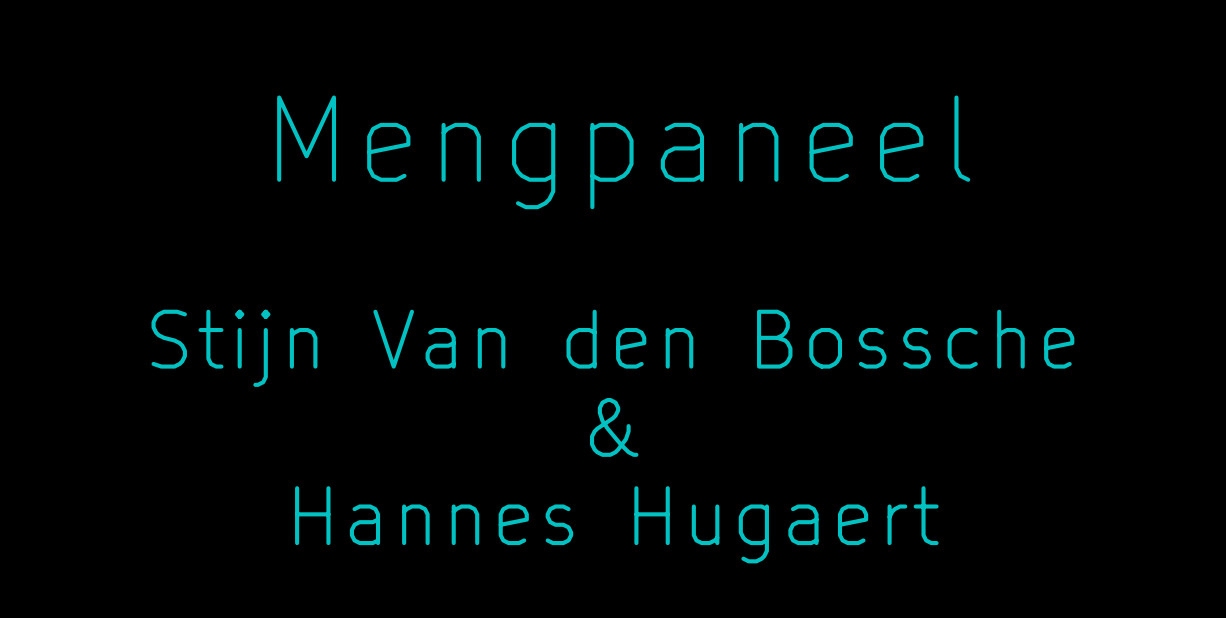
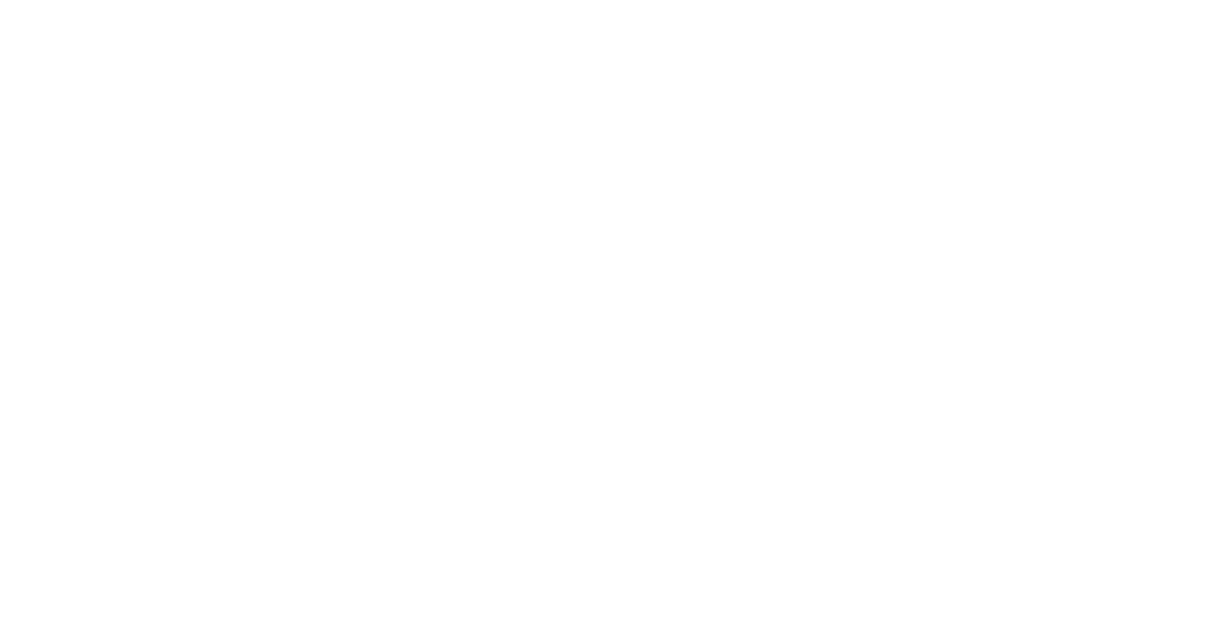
text: Mengpaneel (623, 152) -> none
text: Stijn Van den Bossche (612, 348) -> none
text: & (614, 427) -> none
text: Hannes Hugaert (616, 524) -> none

